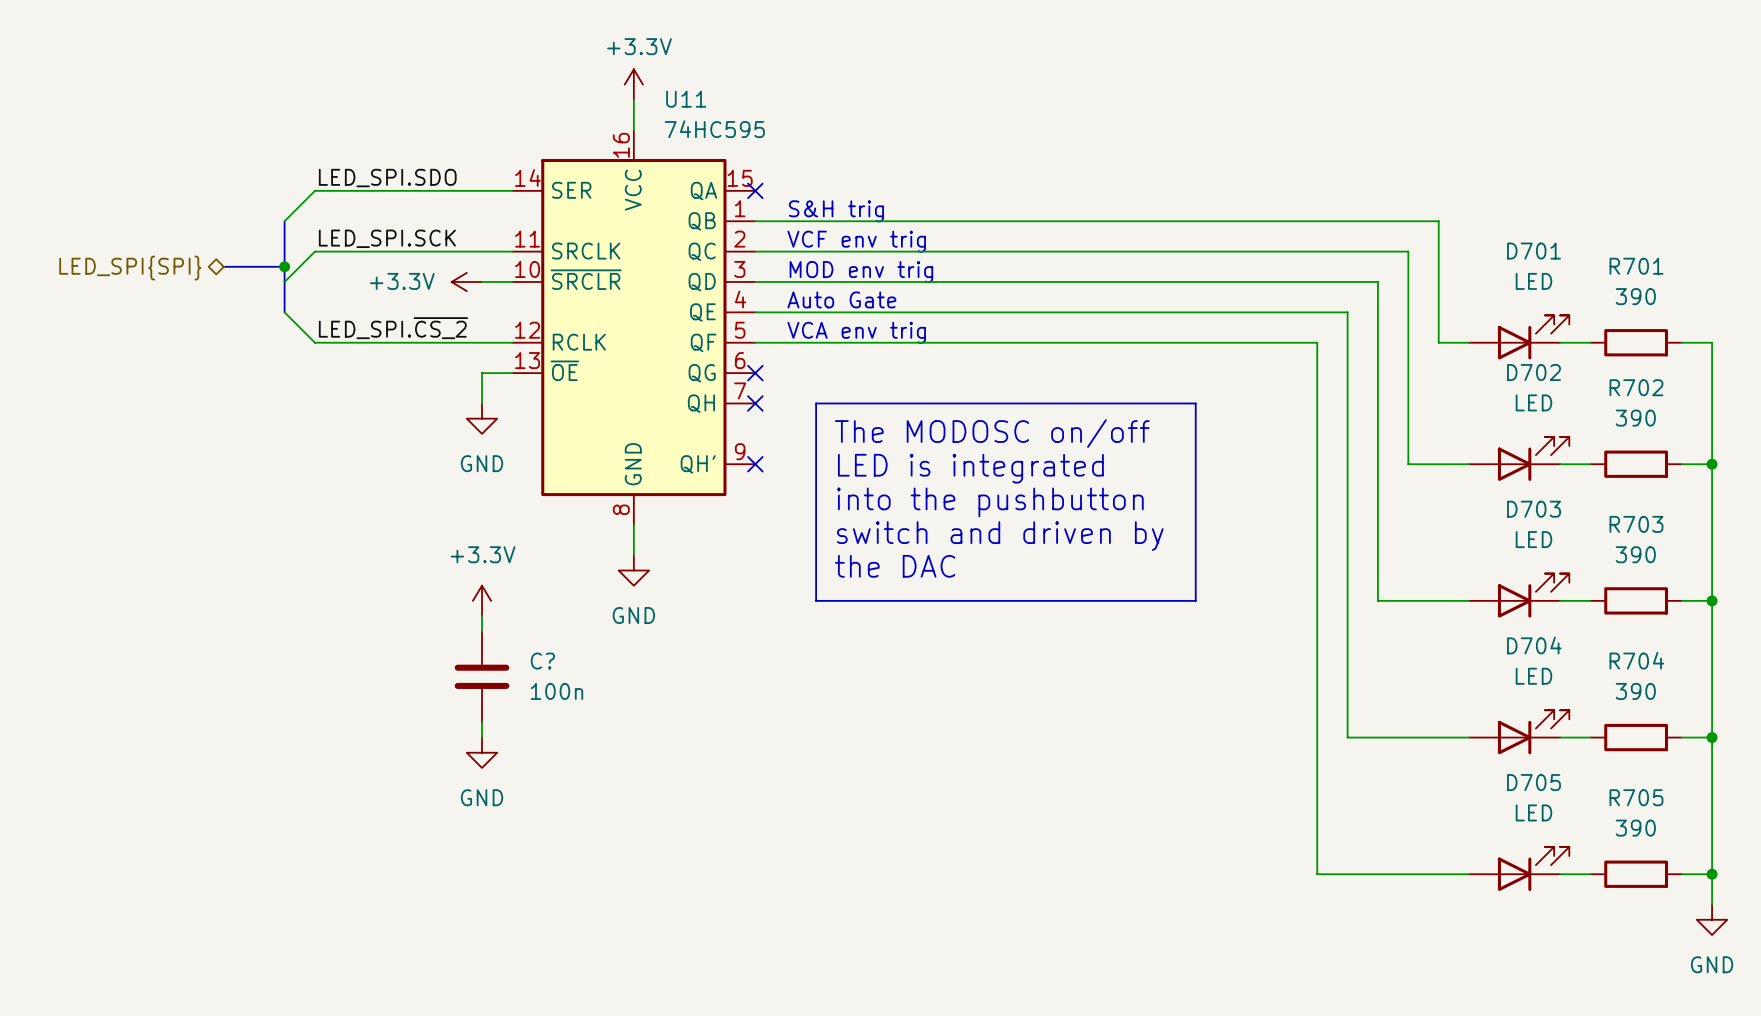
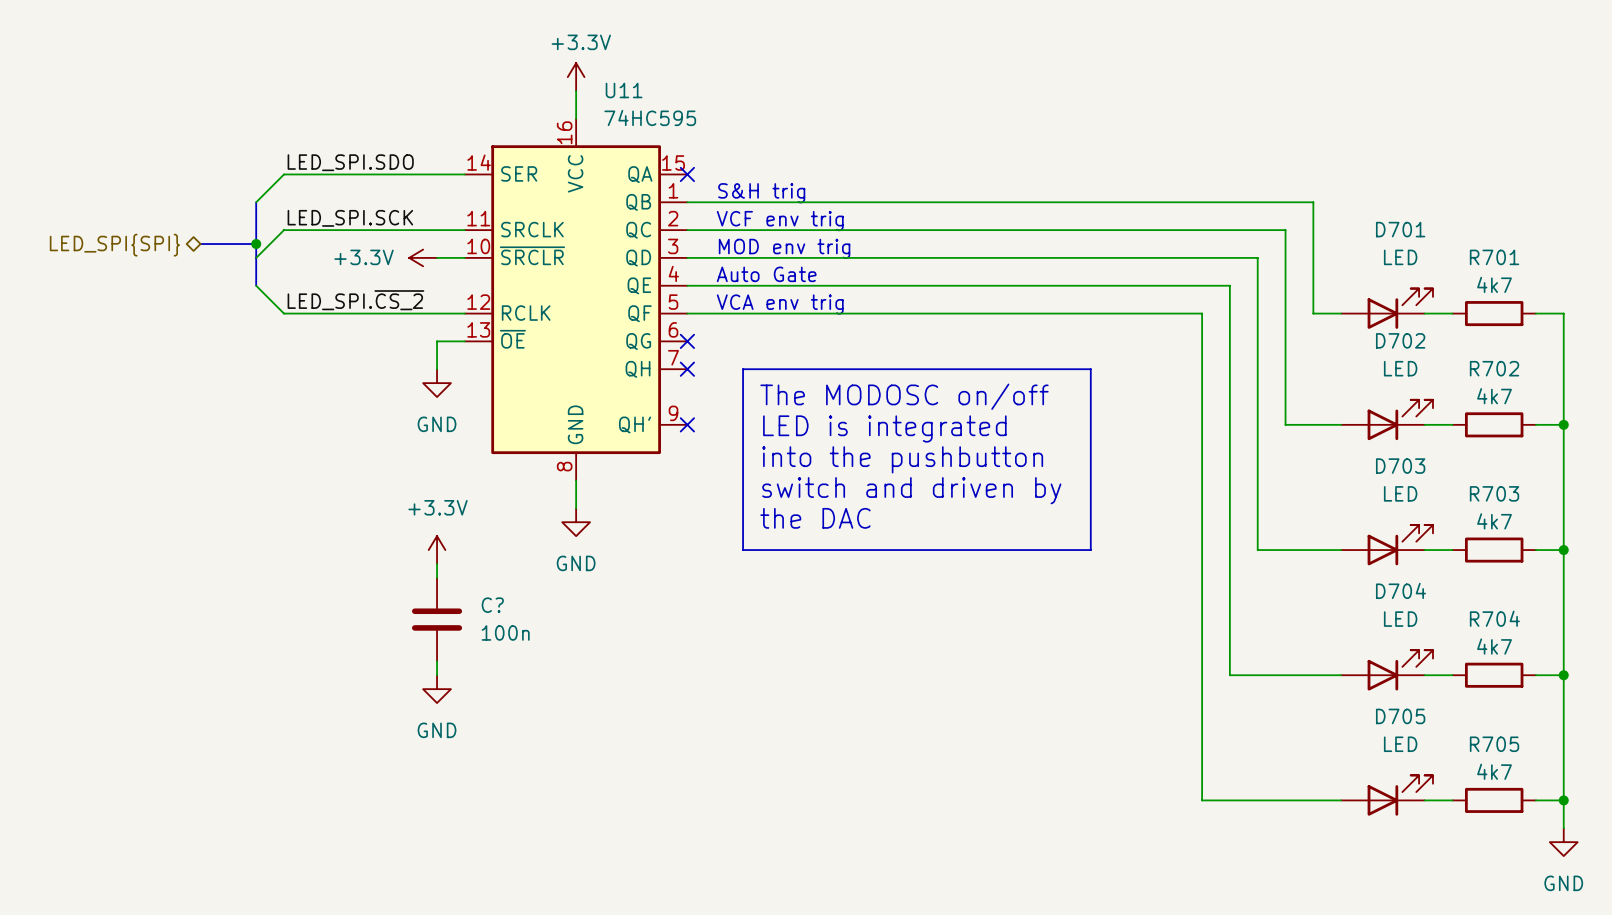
R701 name position: R701 (1636, 266) -> R701 (1494, 257)
R701 value: 390 (1635, 296) -> 4k7 (1494, 284)
R702 name position: R702 (1636, 387) -> R702 (1494, 368)
R702 value: 390 (1635, 418) -> 4k7 (1494, 396)
R703 name position: R703 (1636, 524) -> R703 (1494, 493)
R703 value: 390 (1635, 554) -> 4k7 (1494, 521)
R704 name position: R704 (1636, 660) -> R704 (1494, 618)
R704 value: 390 (1635, 691) -> 4k7 (1494, 646)
R705 name position: R705 (1636, 797) -> R705 (1494, 744)
R705 value: 390 (1635, 828) -> 4k7 (1494, 771)

